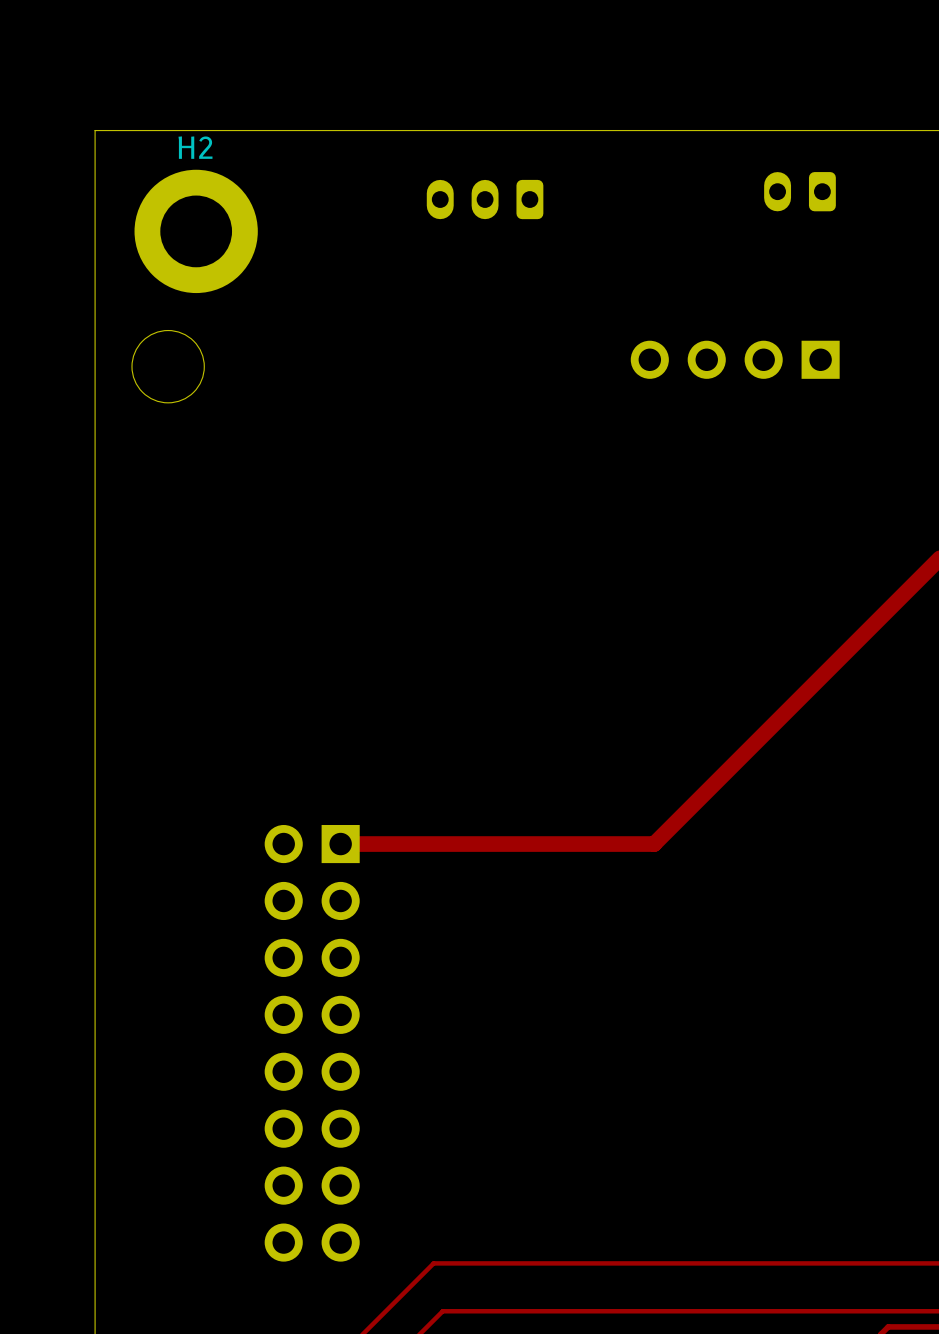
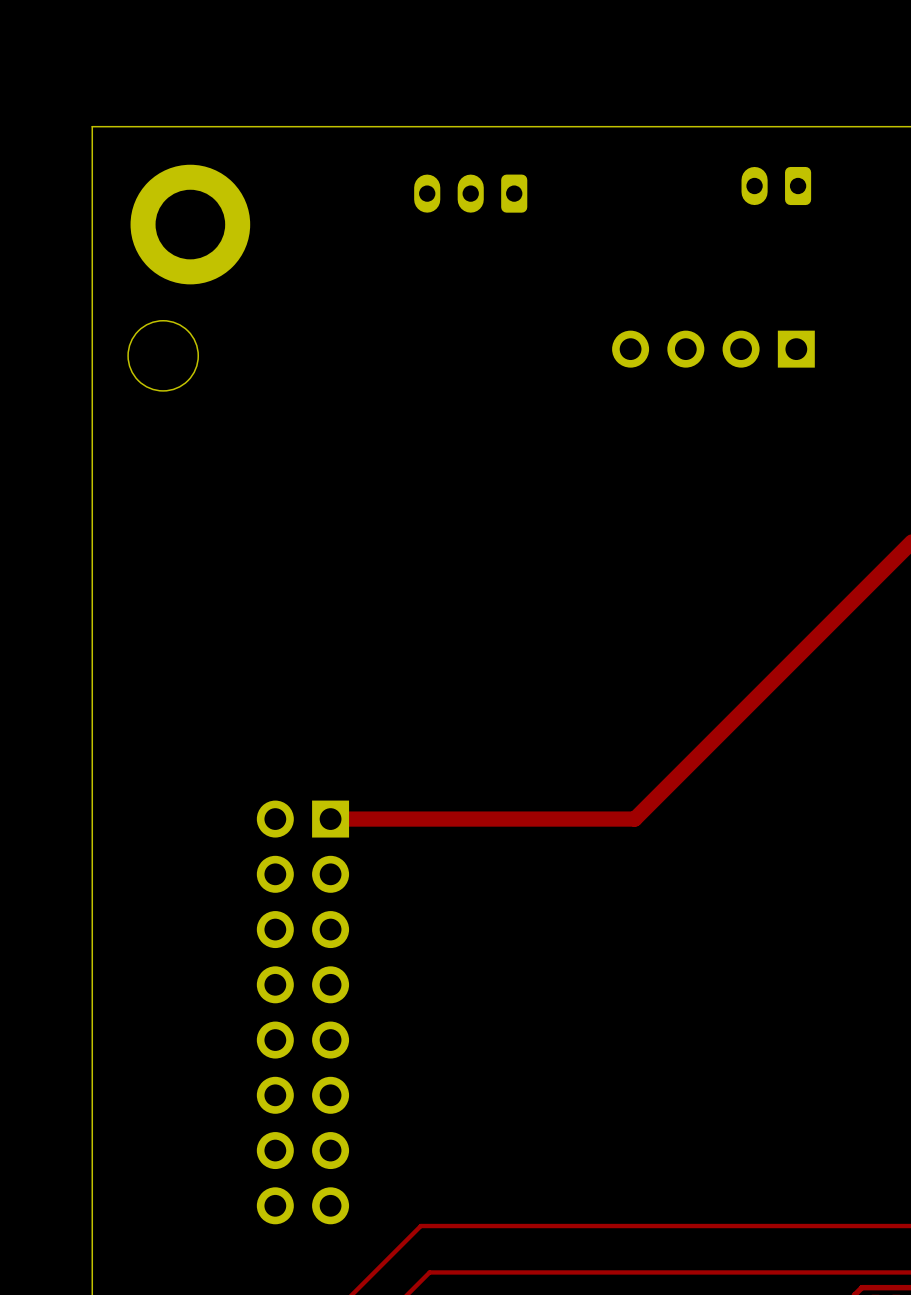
H2 name: H2 (195, 147) -> none

